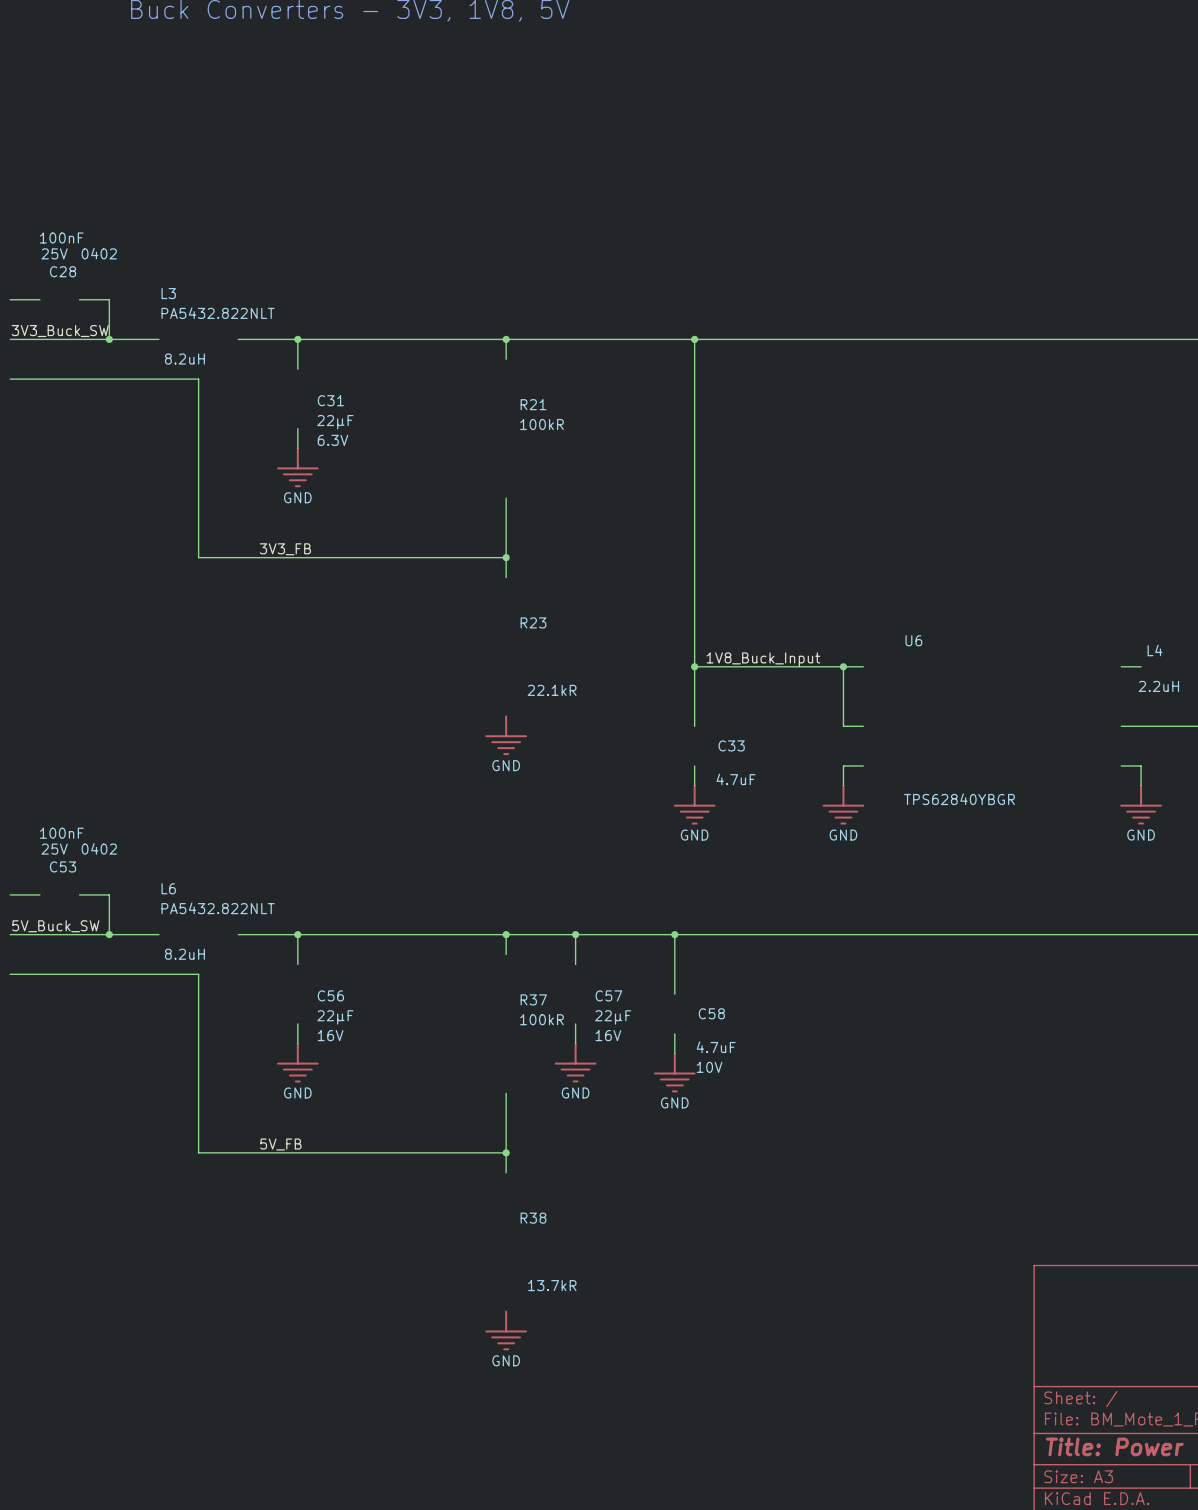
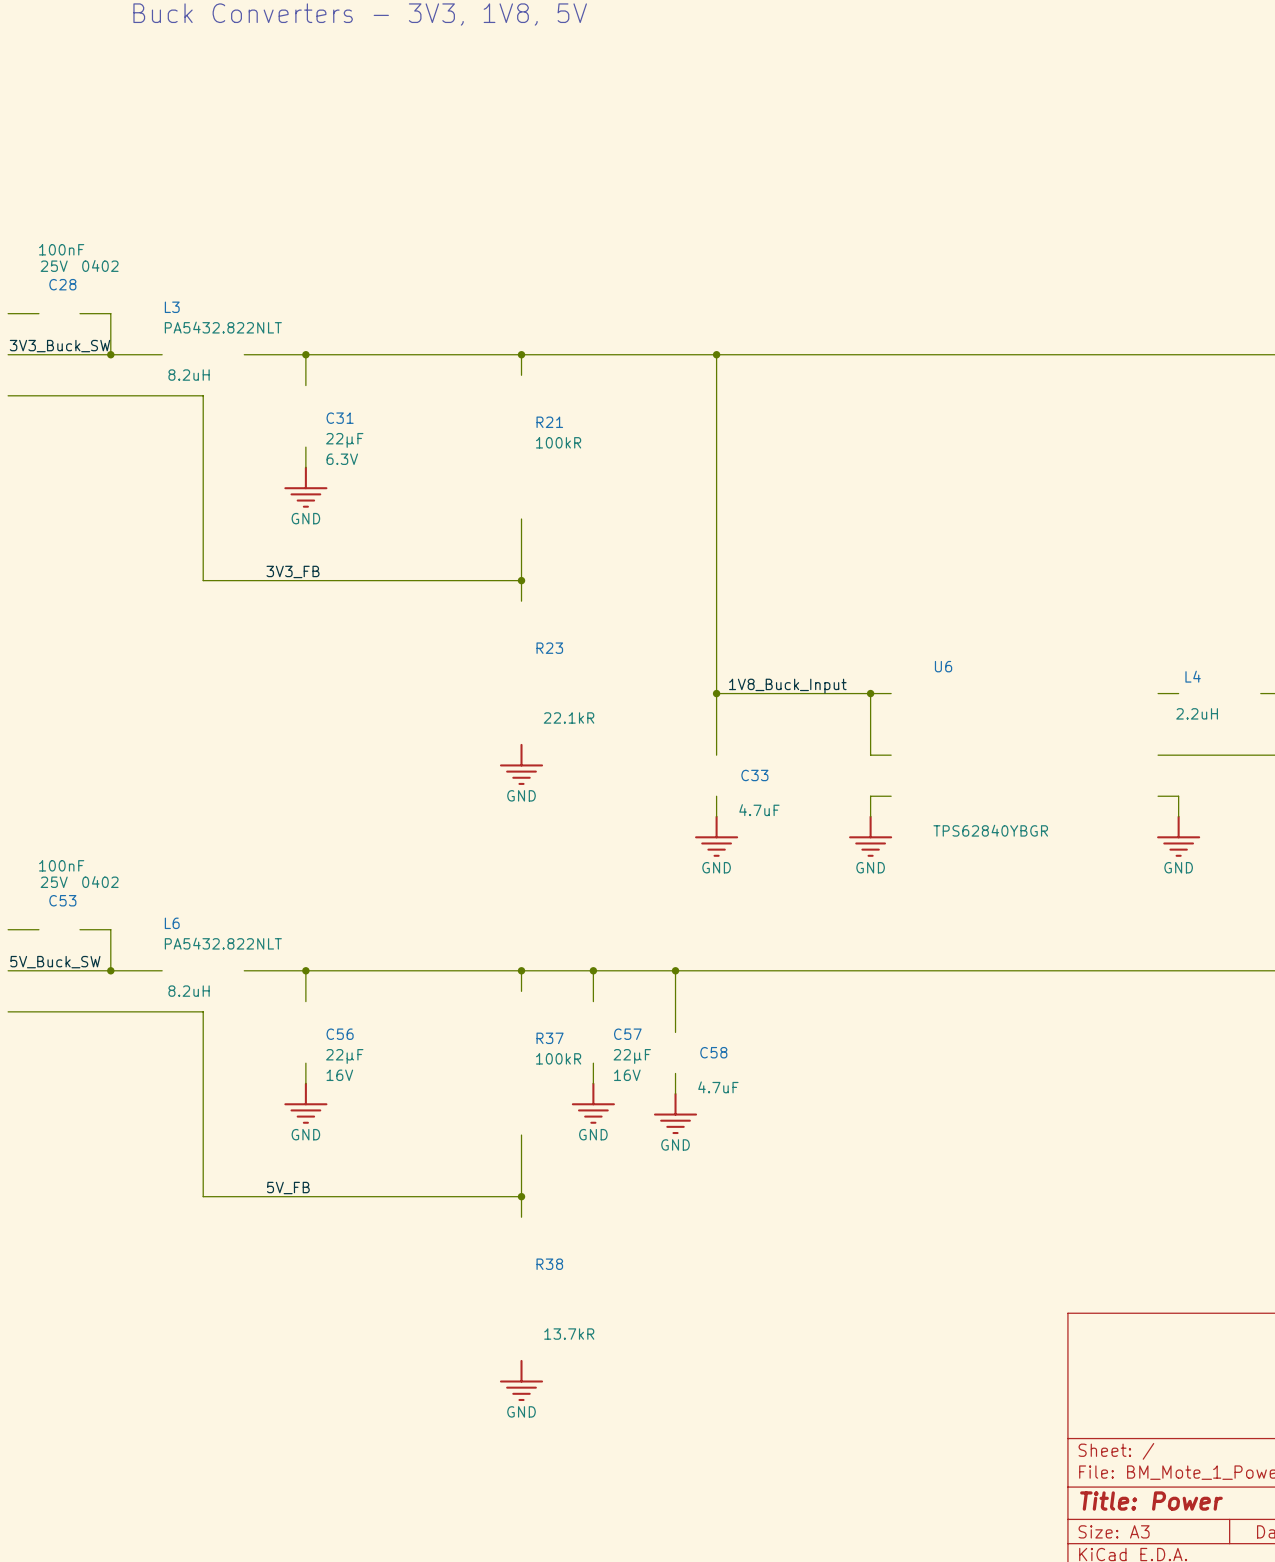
wire: (674, 934) (674, 994) -> (675, 970) (675, 1032)
junction position: (674, 934) -> (675, 970)
C58 name position: C58 (711, 1013) -> C58 (713, 1052)
wire: (674, 1033) (674, 1053) -> (675, 1073) (675, 1094)
C58 position: (716, 1040) -> (718, 1070)
C58 text position: 4.7uF (716, 1047) -> 4.7uF (718, 1087)
C58 text: 10V (709, 1067) -> none
power symbol position: GND (674, 1072) -> GND (675, 1113)

